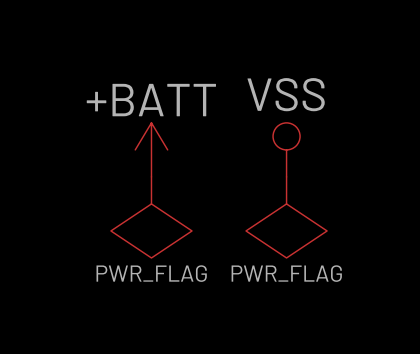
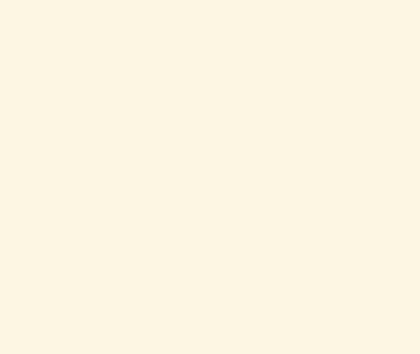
power symbol: +BATT (151, 149) -> none
power symbol: VSS (286, 149) -> none
power symbol: PWR_FLAG (151, 217) -> none
power symbol: PWR_FLAG (286, 217) -> none

